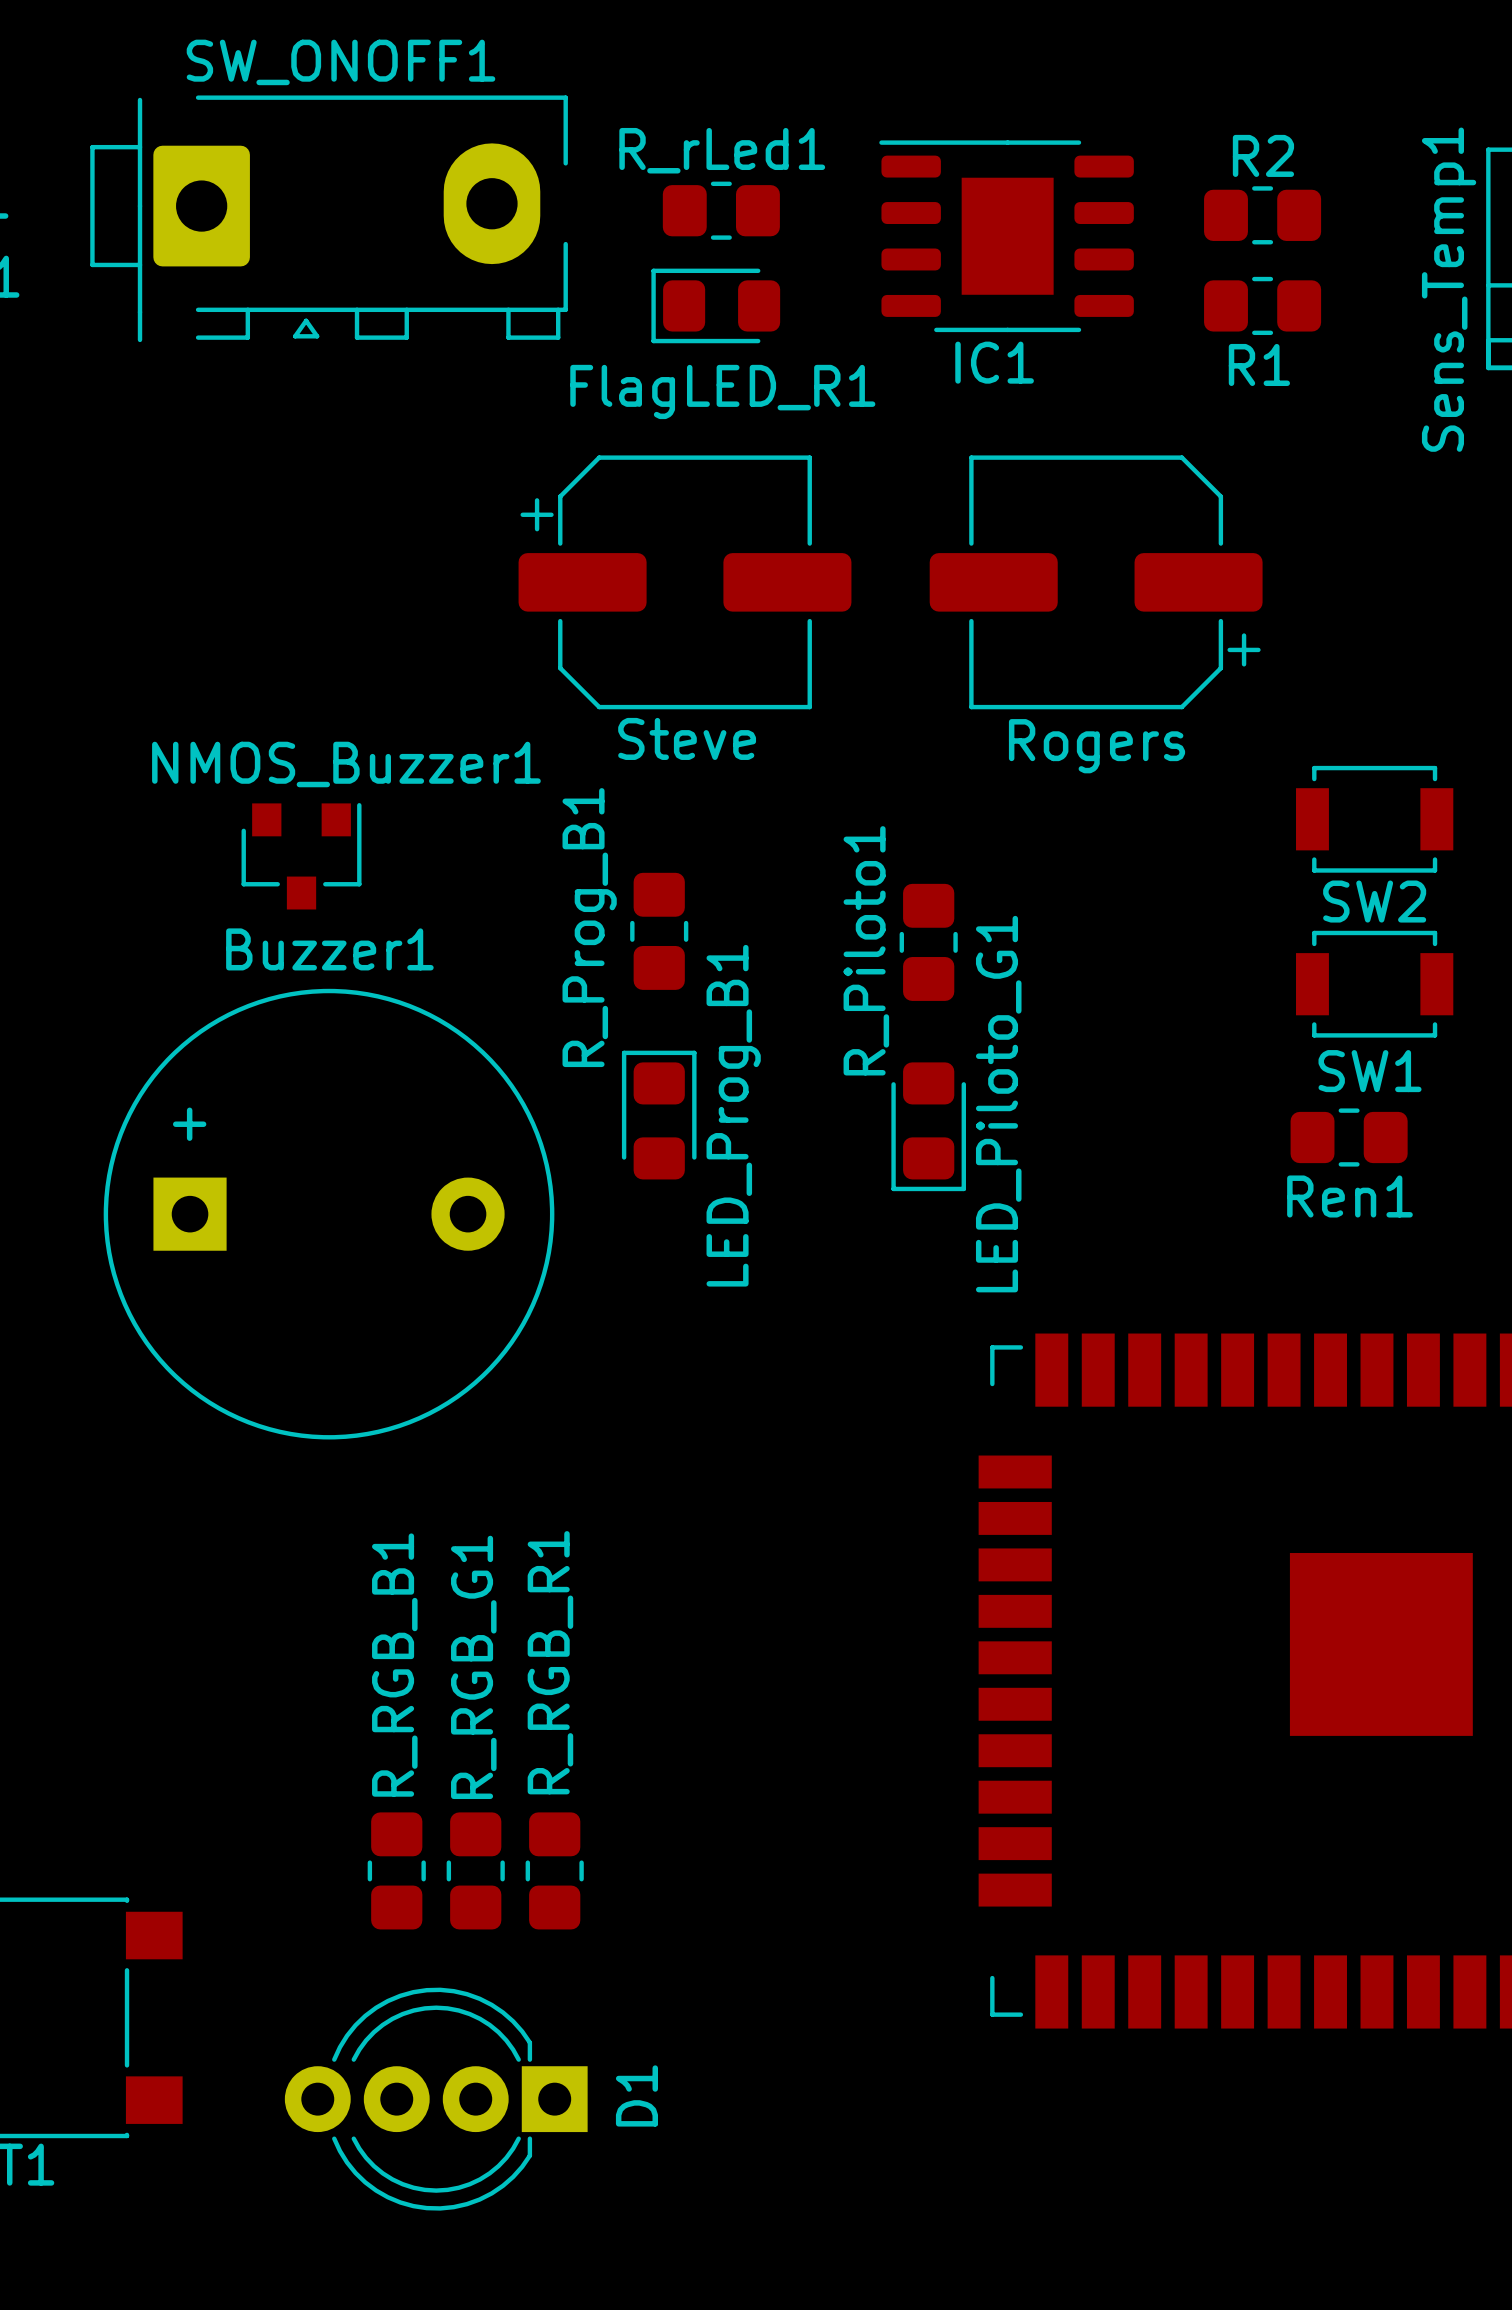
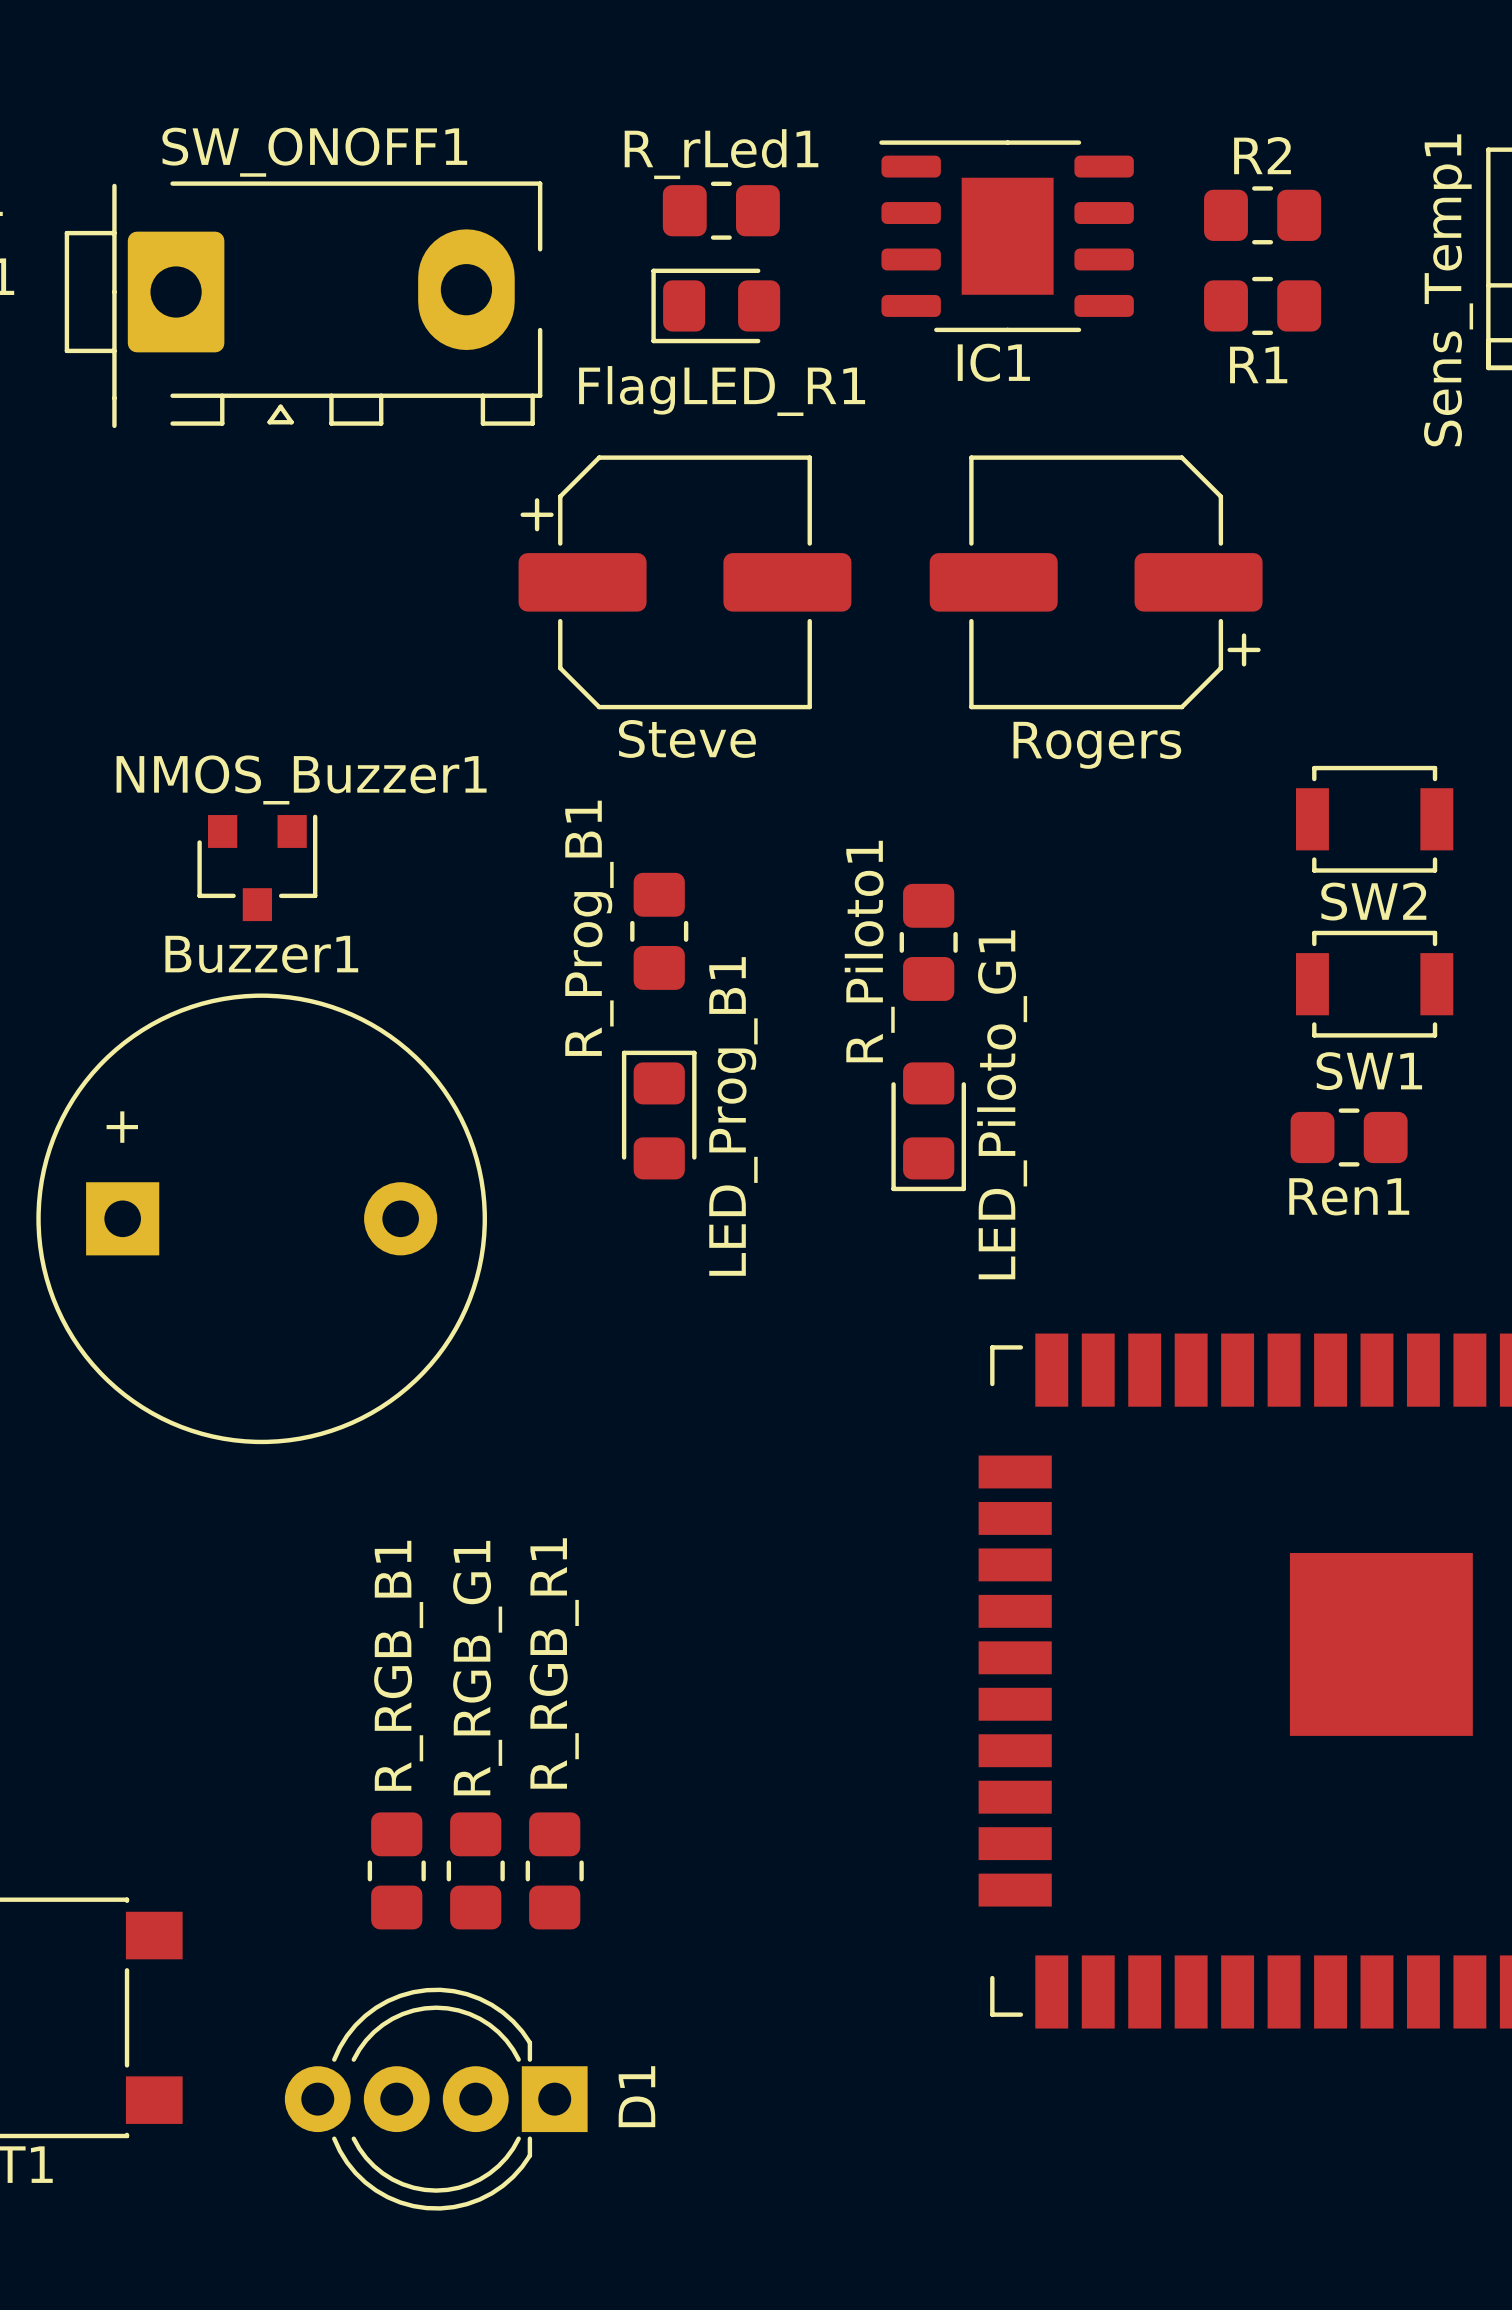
SW_ONOFF1 position: (329, 218) -> (303, 304)
NMOS_Buzzer1 position: (301, 856) -> (257, 867)
Buzzer1 position: (329, 1214) -> (261, 1218)

